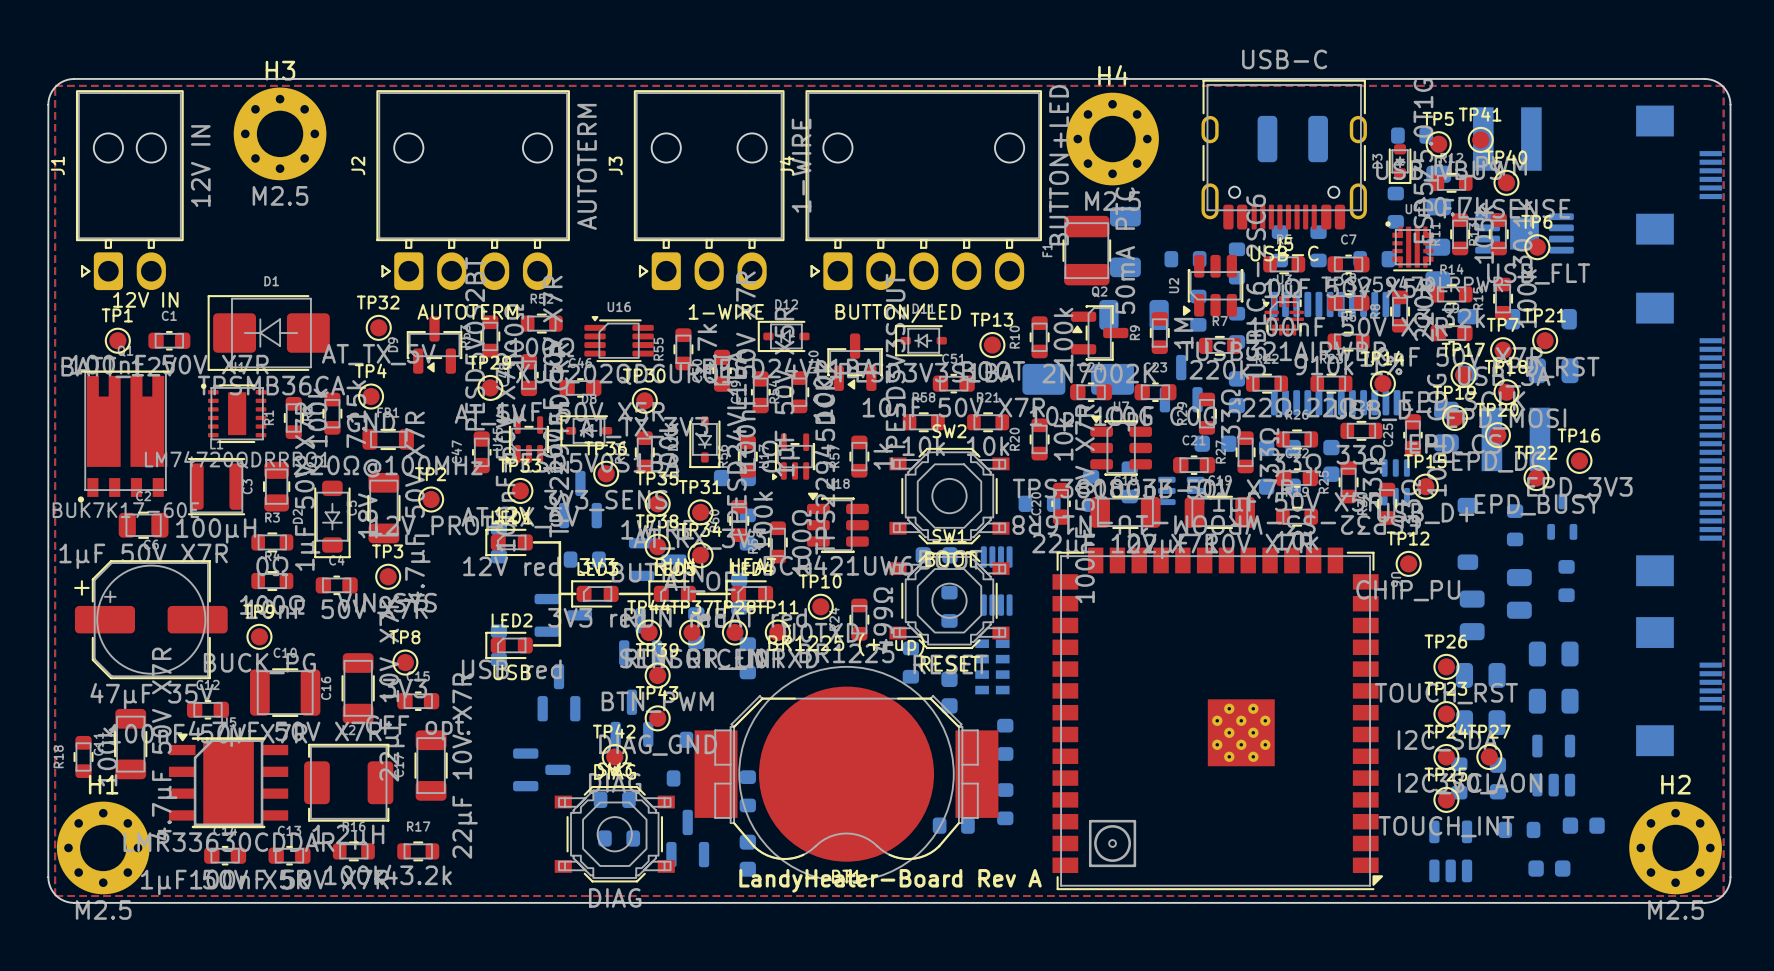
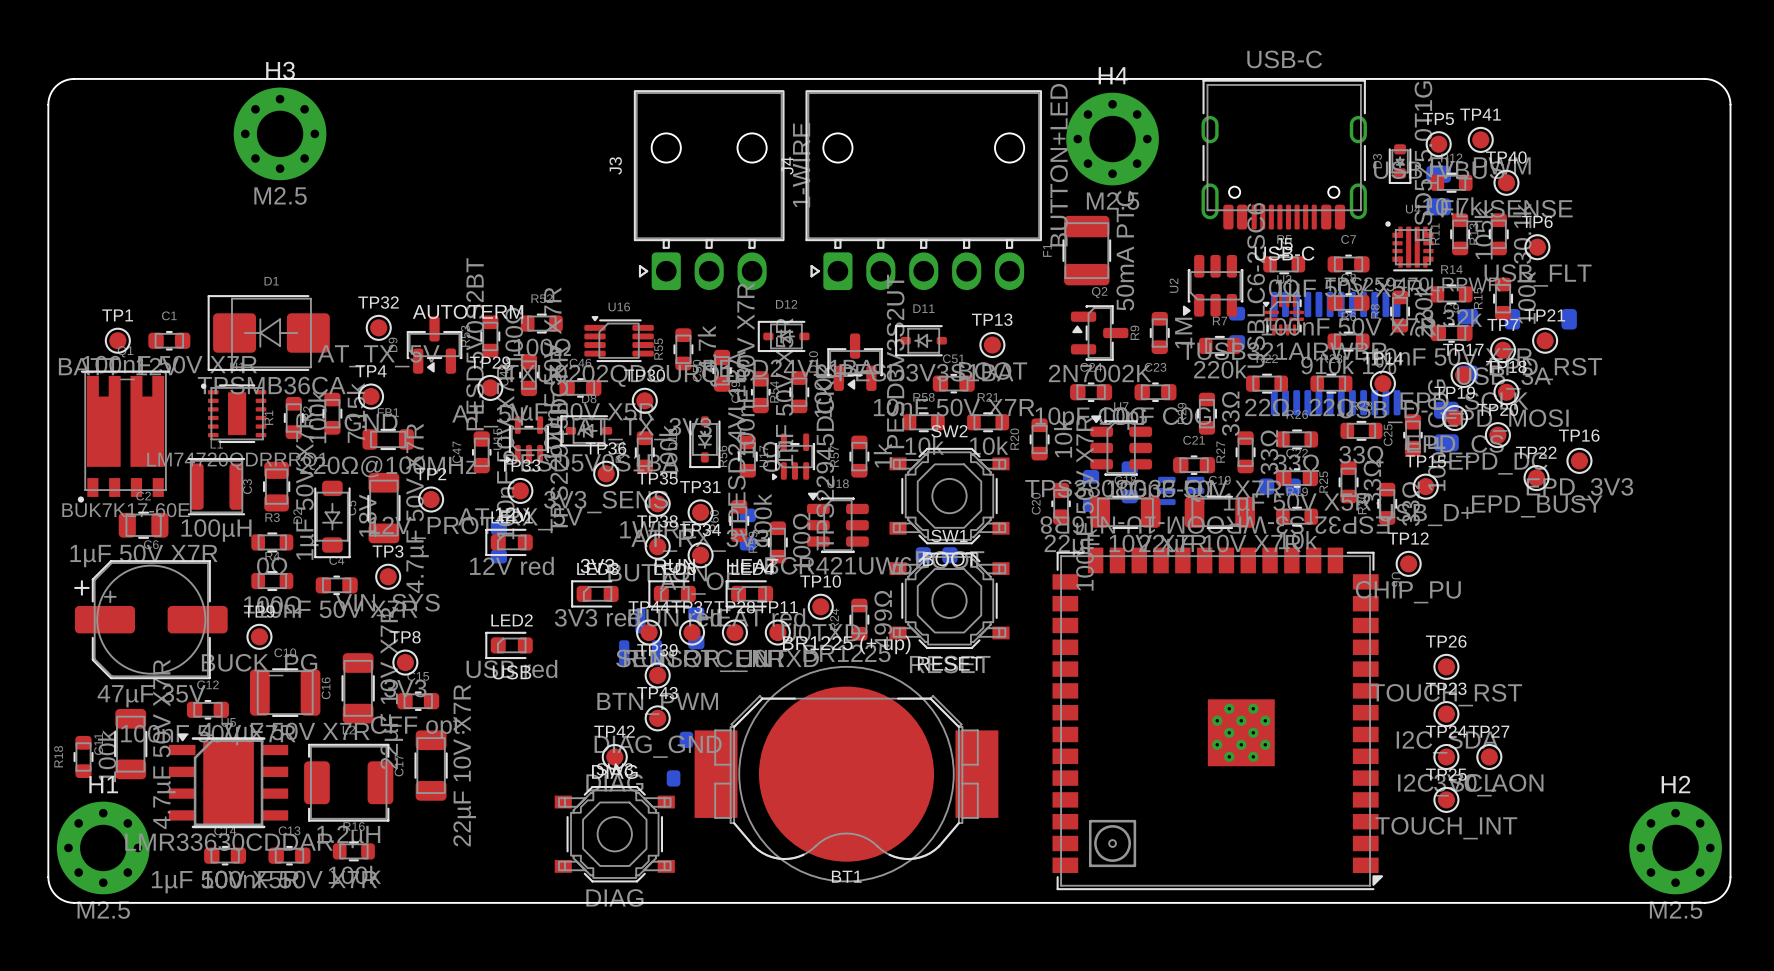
top zone outline: (55, 85) (1723, 85) (1723, 896) (55, 896) (55, 85) -> none
part: (1412, 135) -> none
part: (1292, 139) -> none
part: (1507, 139) -> none
part: (1679, 175) -> none
J1: 12V IN (129, 190) -> none
J2: AUTOTERM (473, 190) -> none
part: (1395, 207) -> none
part: (1524, 233) -> none
part: (1125, 242) -> none
part: (1279, 246) -> none
part: (1318, 246) -> none
part: (1185, 259) -> none
part: (1374, 259) -> none
part: (1237, 263) -> none
part: (1437, 263) -> none
text: 12V IN (145, 299) -> none
part: (1198, 310) -> none
text: 1-WIRE (726, 311) -> none
text: BUTTON/LED (898, 313) -> none
part: (1134, 314) -> none
R10: 100k (1039, 337) -> none
part: (1553, 370) -> none
part: (1078, 379) -> none
part: (1181, 383) -> none
part: (1237, 392) -> none
part: (1515, 439) -> none
part: (1679, 439) -> none
part: (1215, 443) -> none
part: (1279, 448) -> none
part: (1331, 460) -> none
part: (734, 478) -> none
part: (1395, 482) -> none
part: (580, 499) -> none
part: (1039, 503) -> none
part: (1562, 516) -> none
part: (1515, 525) -> none
part: (1467, 533) -> none
line: (534, 542) (559, 542) (559, 645) (534, 645) -> none
part: (584, 559) -> none
part: (657, 559) -> none
part: (996, 581) -> none
part: (1566, 581) -> none
line: (559, 593) (575, 593) -> none
line: (619, 593) (652, 593) -> none
line: (697, 593) (729, 593) -> none
part: (739, 593) -> none
part: (1519, 593) -> none
part: (949, 606) -> none
part: (563, 615) -> none
part: (1472, 615) -> none
part: (498, 645) -> none
part: (1553, 653) -> none
part: (747, 658) -> none
part: (910, 662) -> none
part: (992, 666) -> none
part: (1480, 675) -> none
part: (1679, 686) -> none
part: (558, 692) -> none
part: (949, 692) -> none
part: (1553, 701) -> none
part: (631, 718) -> none
part: (1480, 722) -> none
part: (1005, 739) -> none
part: (1553, 765) -> none
part: (541, 769) -> none
part: (1459, 778) -> none
part: (1497, 778) -> none
part: (747, 791) -> none
part: (614, 799) -> none
part: (1005, 804) -> none
part: (953, 825) -> none
part: (1583, 825) -> none
part: (1519, 829) -> none
part: (619, 838) -> none
part: (687, 838) -> none
R17: 43.2k (418, 851) -> none
part: (1450, 851) -> none
part: (747, 855) -> none
part: (1549, 868) -> none
text: LandyHeater-Board Rev A (890, 880) -> none

